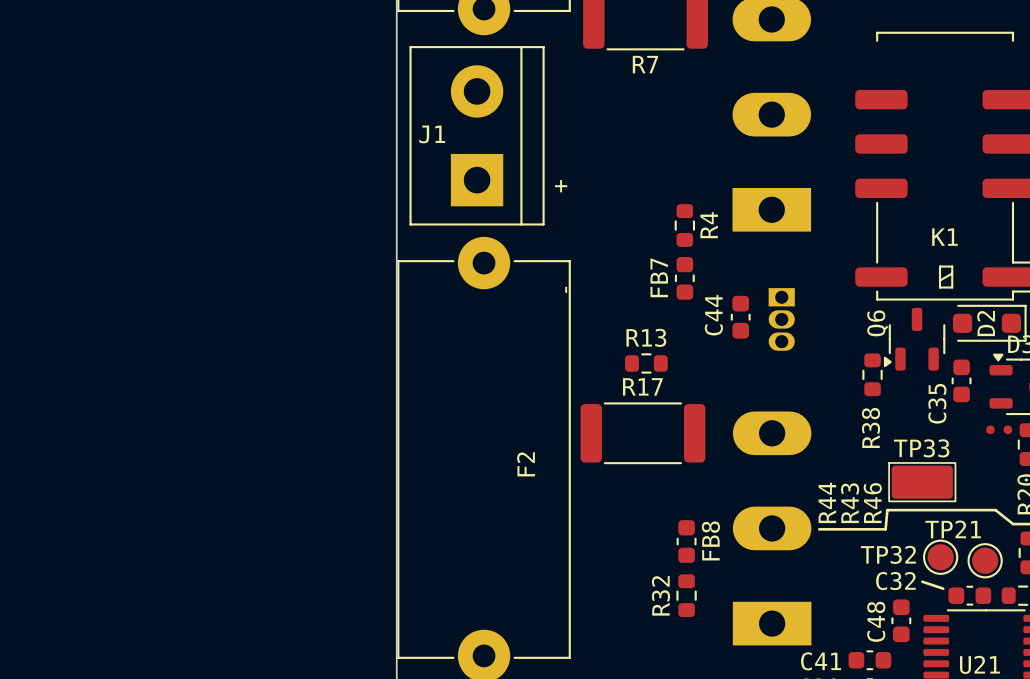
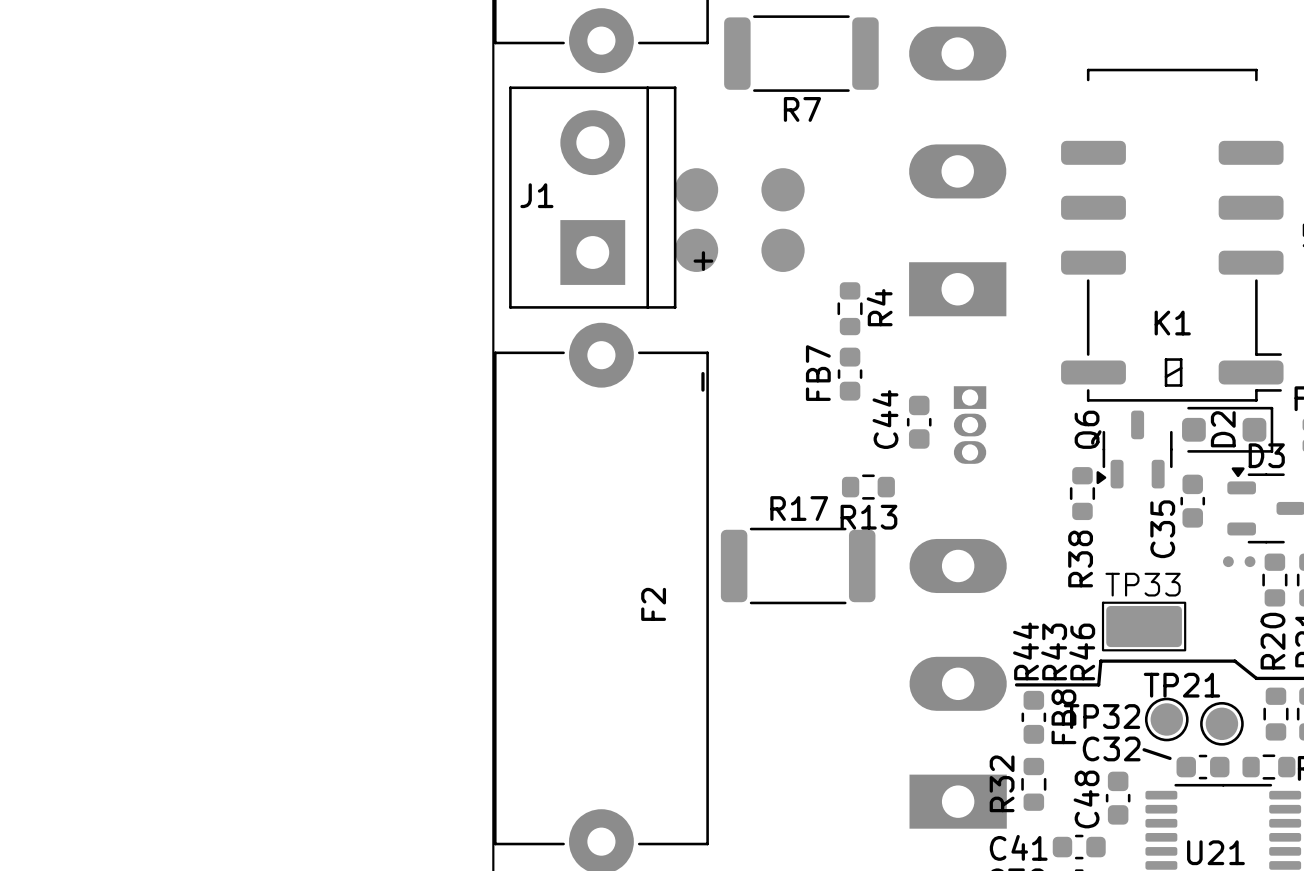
part: none -> (739, 189)
part: none -> (739, 250)
R13 name position: R13 (646, 337) -> R13 (868, 517)
R13 position: (646, 363) -> (868, 487)
FB8 position: (686, 541) -> (1033, 717)
R32 position: (686, 595) -> (1033, 784)

